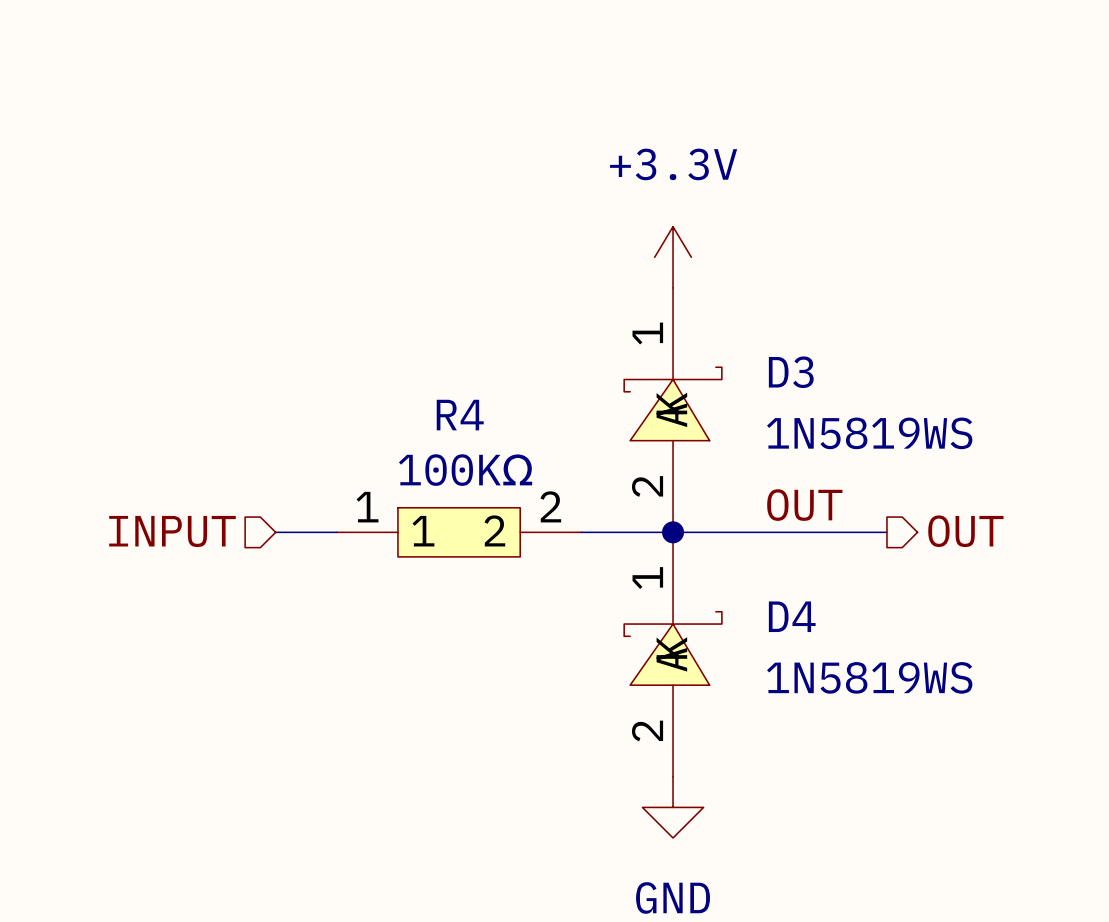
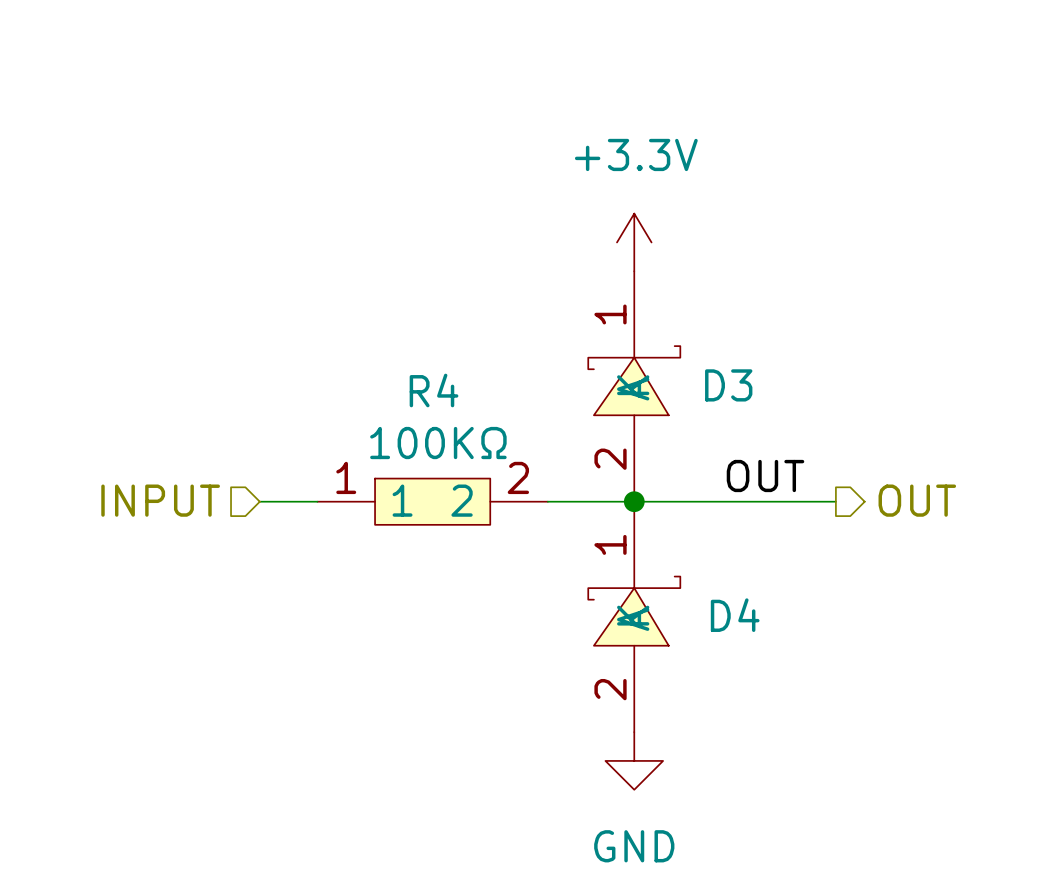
D3 name position: D3 (791, 372) -> D3 (728, 385)
D3 value: 1N5819WS (869, 433) -> none
D4 name position: D4 (792, 616) -> D4 (735, 615)
D4 value: 1N5819WS (869, 677) -> none

